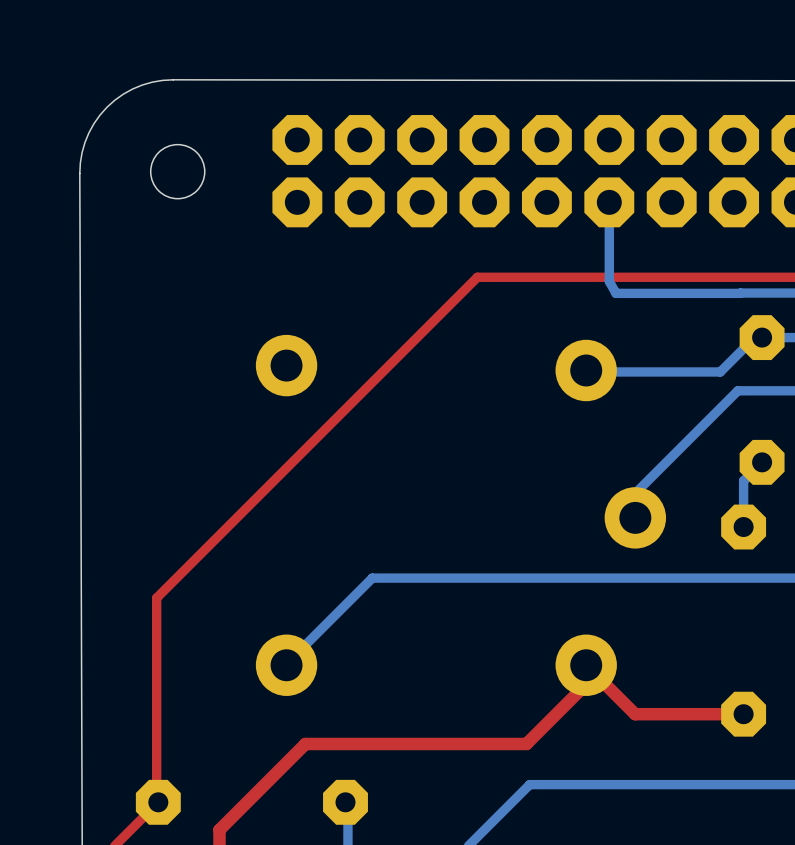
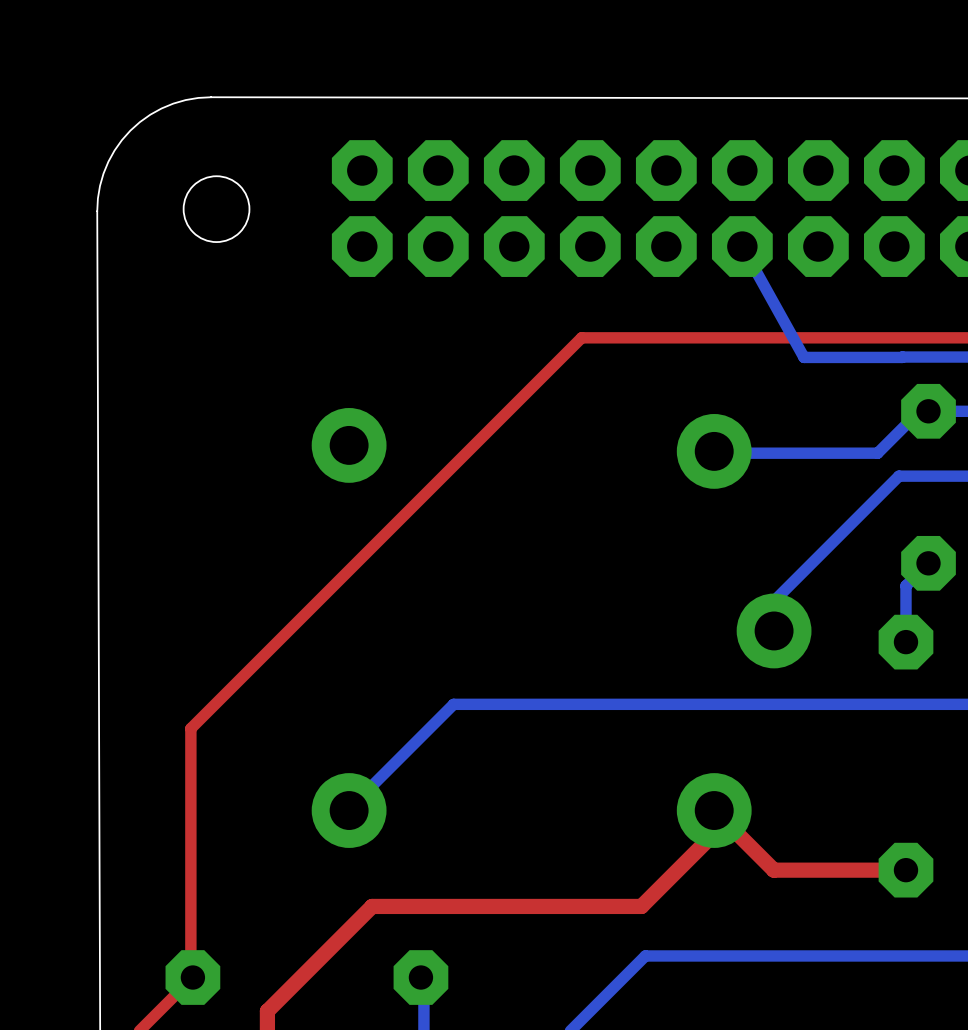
bottom track: (609, 202) (609, 281) (615, 293) (659, 293) -> (742, 246) (804, 357)

